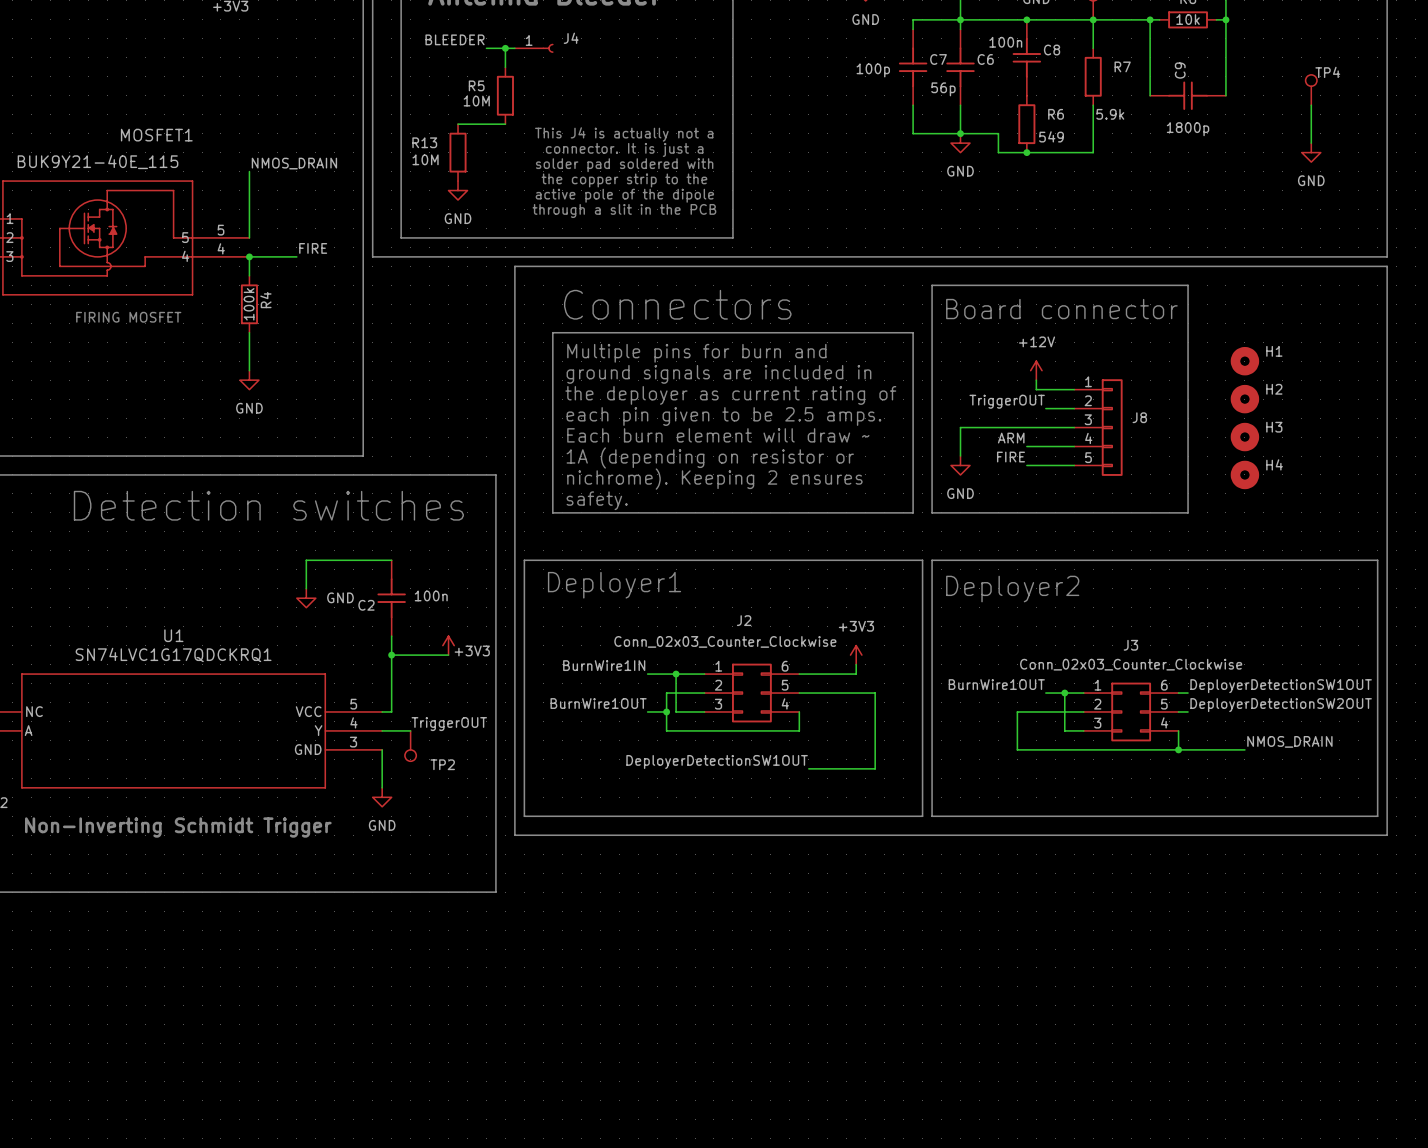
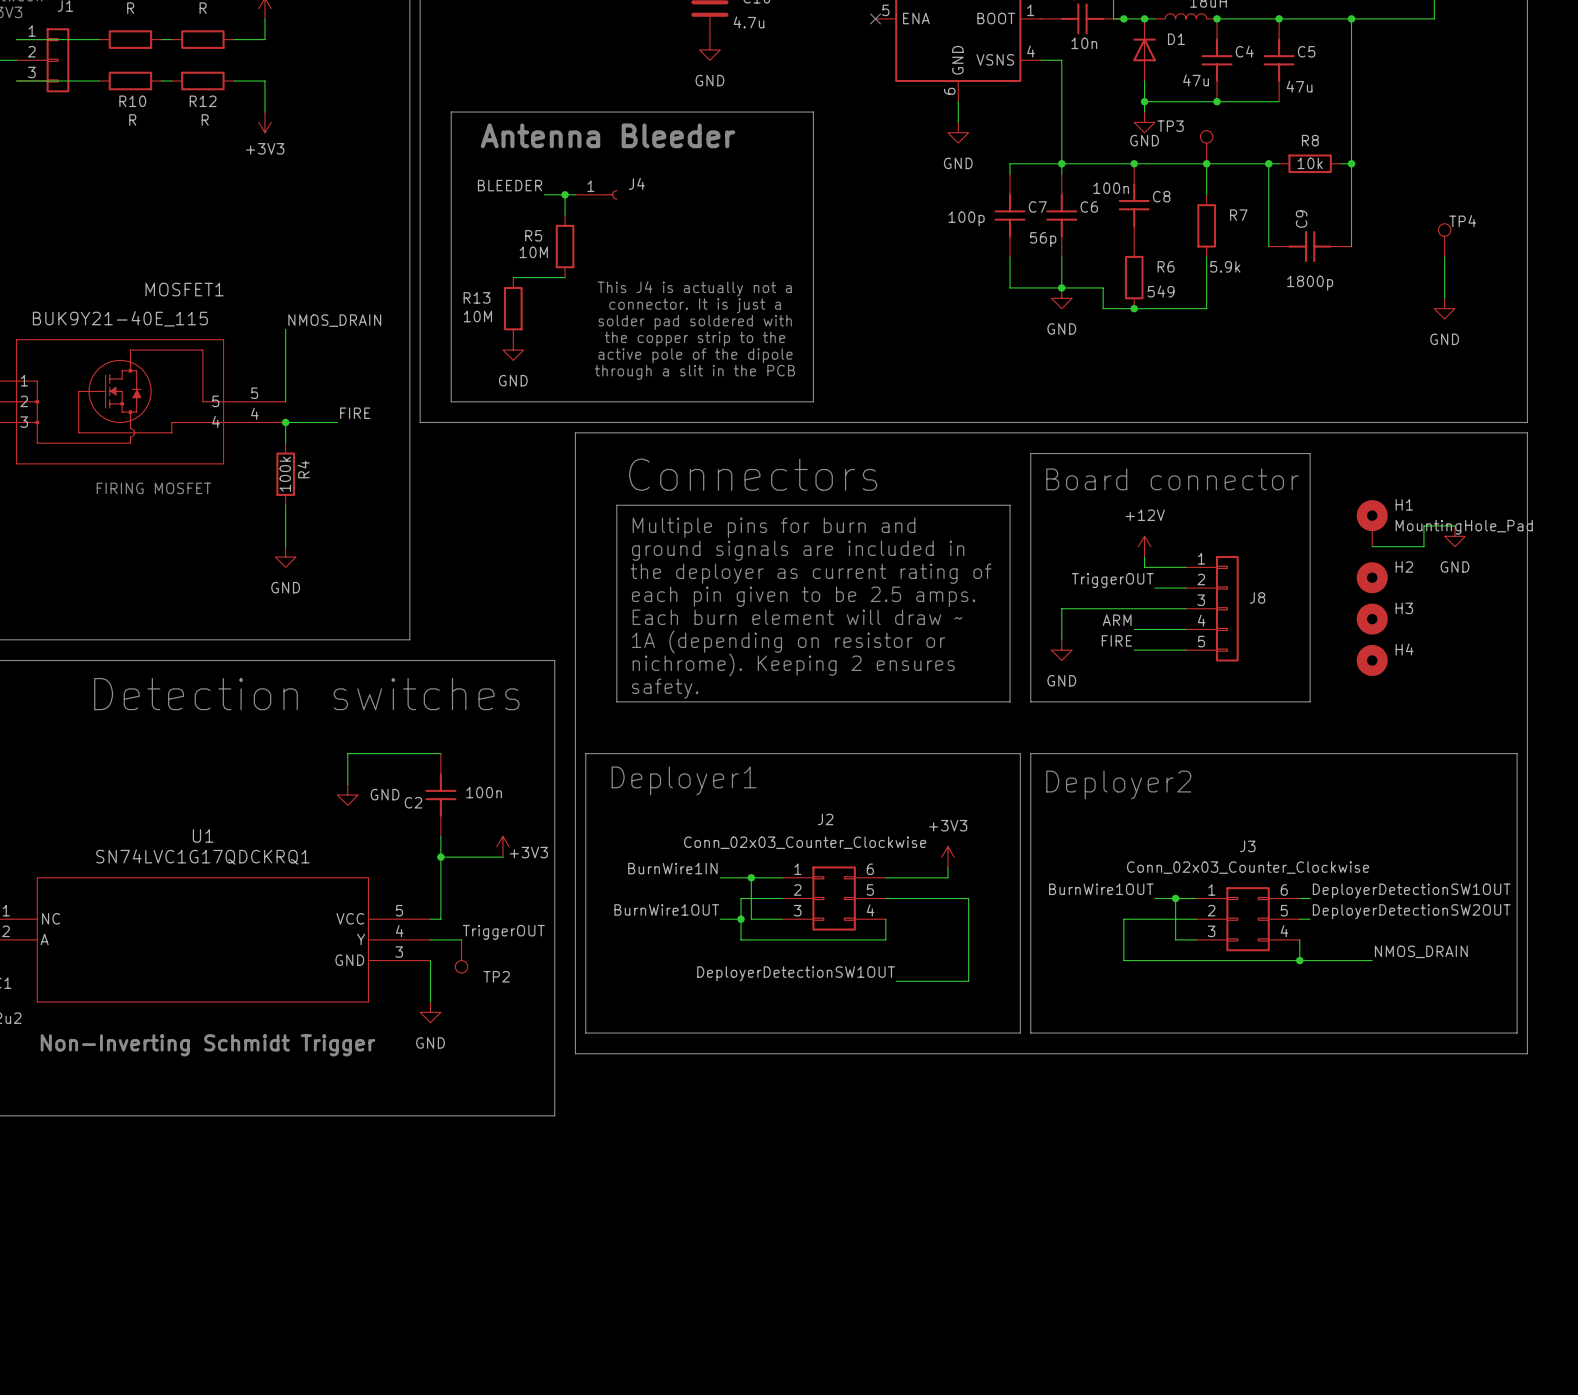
H1 symbol: [1230, 346, 1260, 376] -> [1356, 500, 1388, 547]
wire: none -> (1455, 525) (1423, 525) (1423, 546) (1372, 546)
H1 value: none -> MountingHole_Pad (1464, 527)
power symbol: none -> GND (1455, 536)

